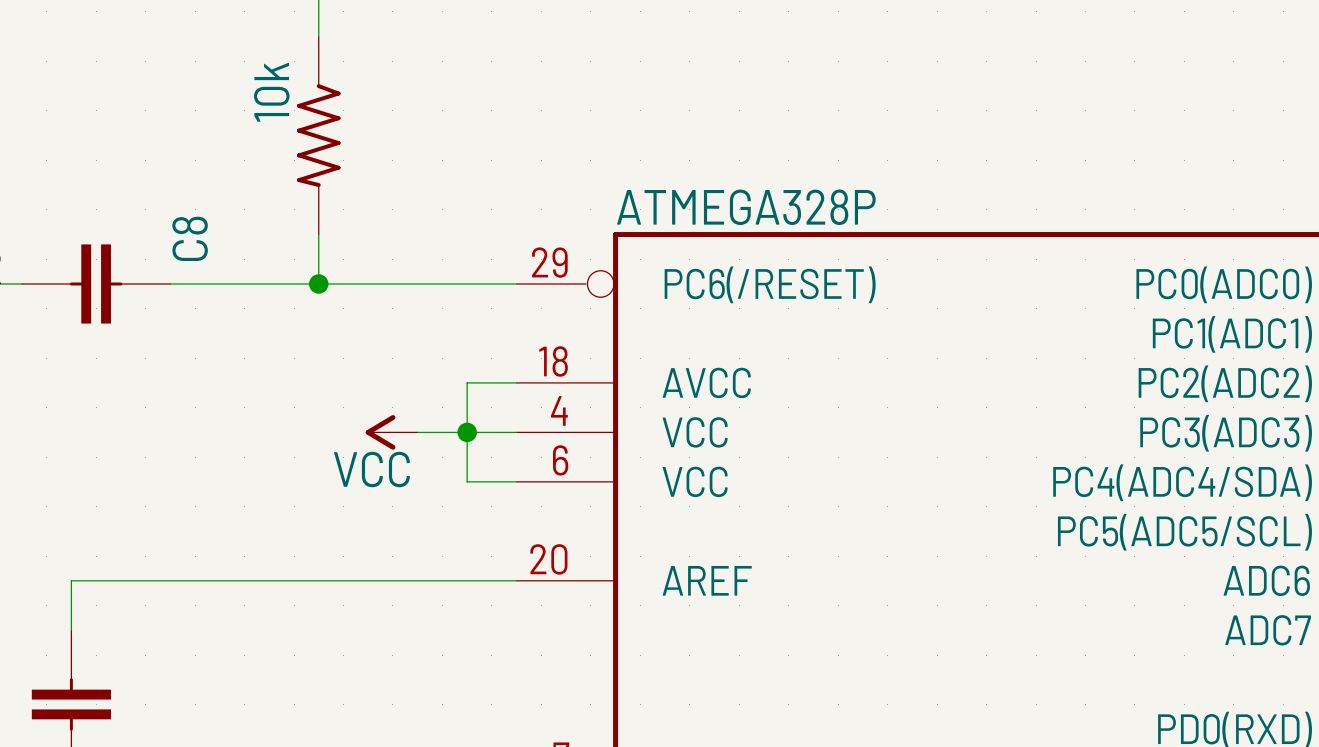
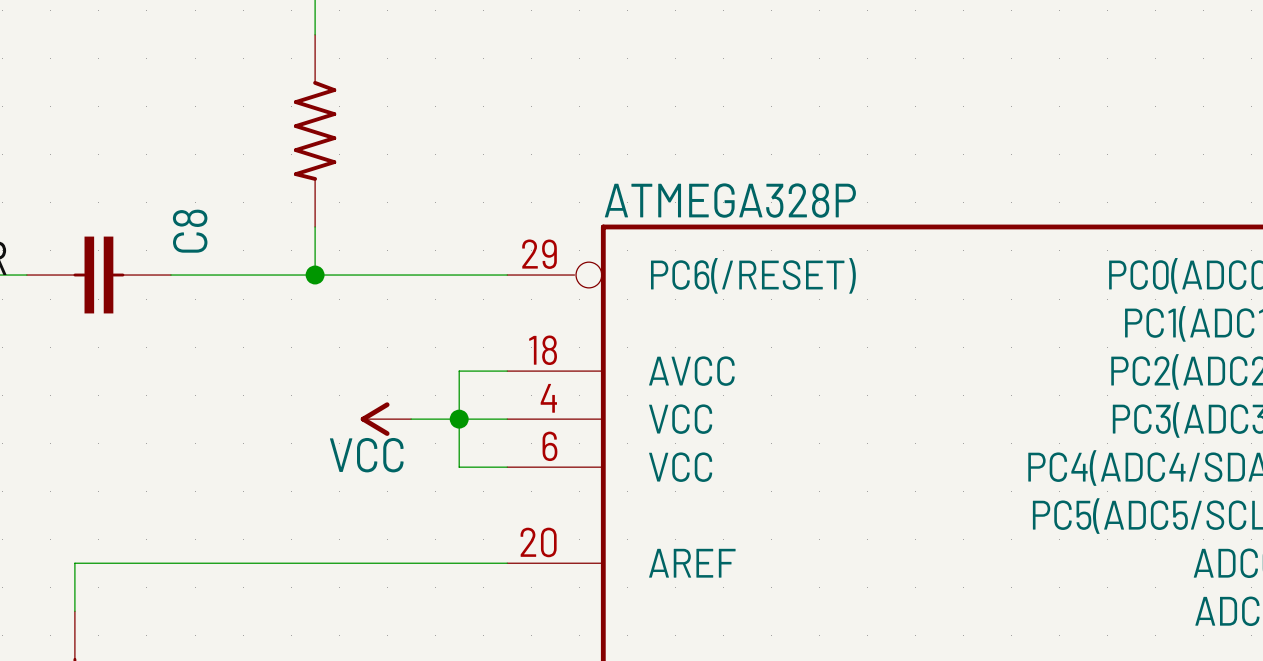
part value: 10k (271, 92) -> none

